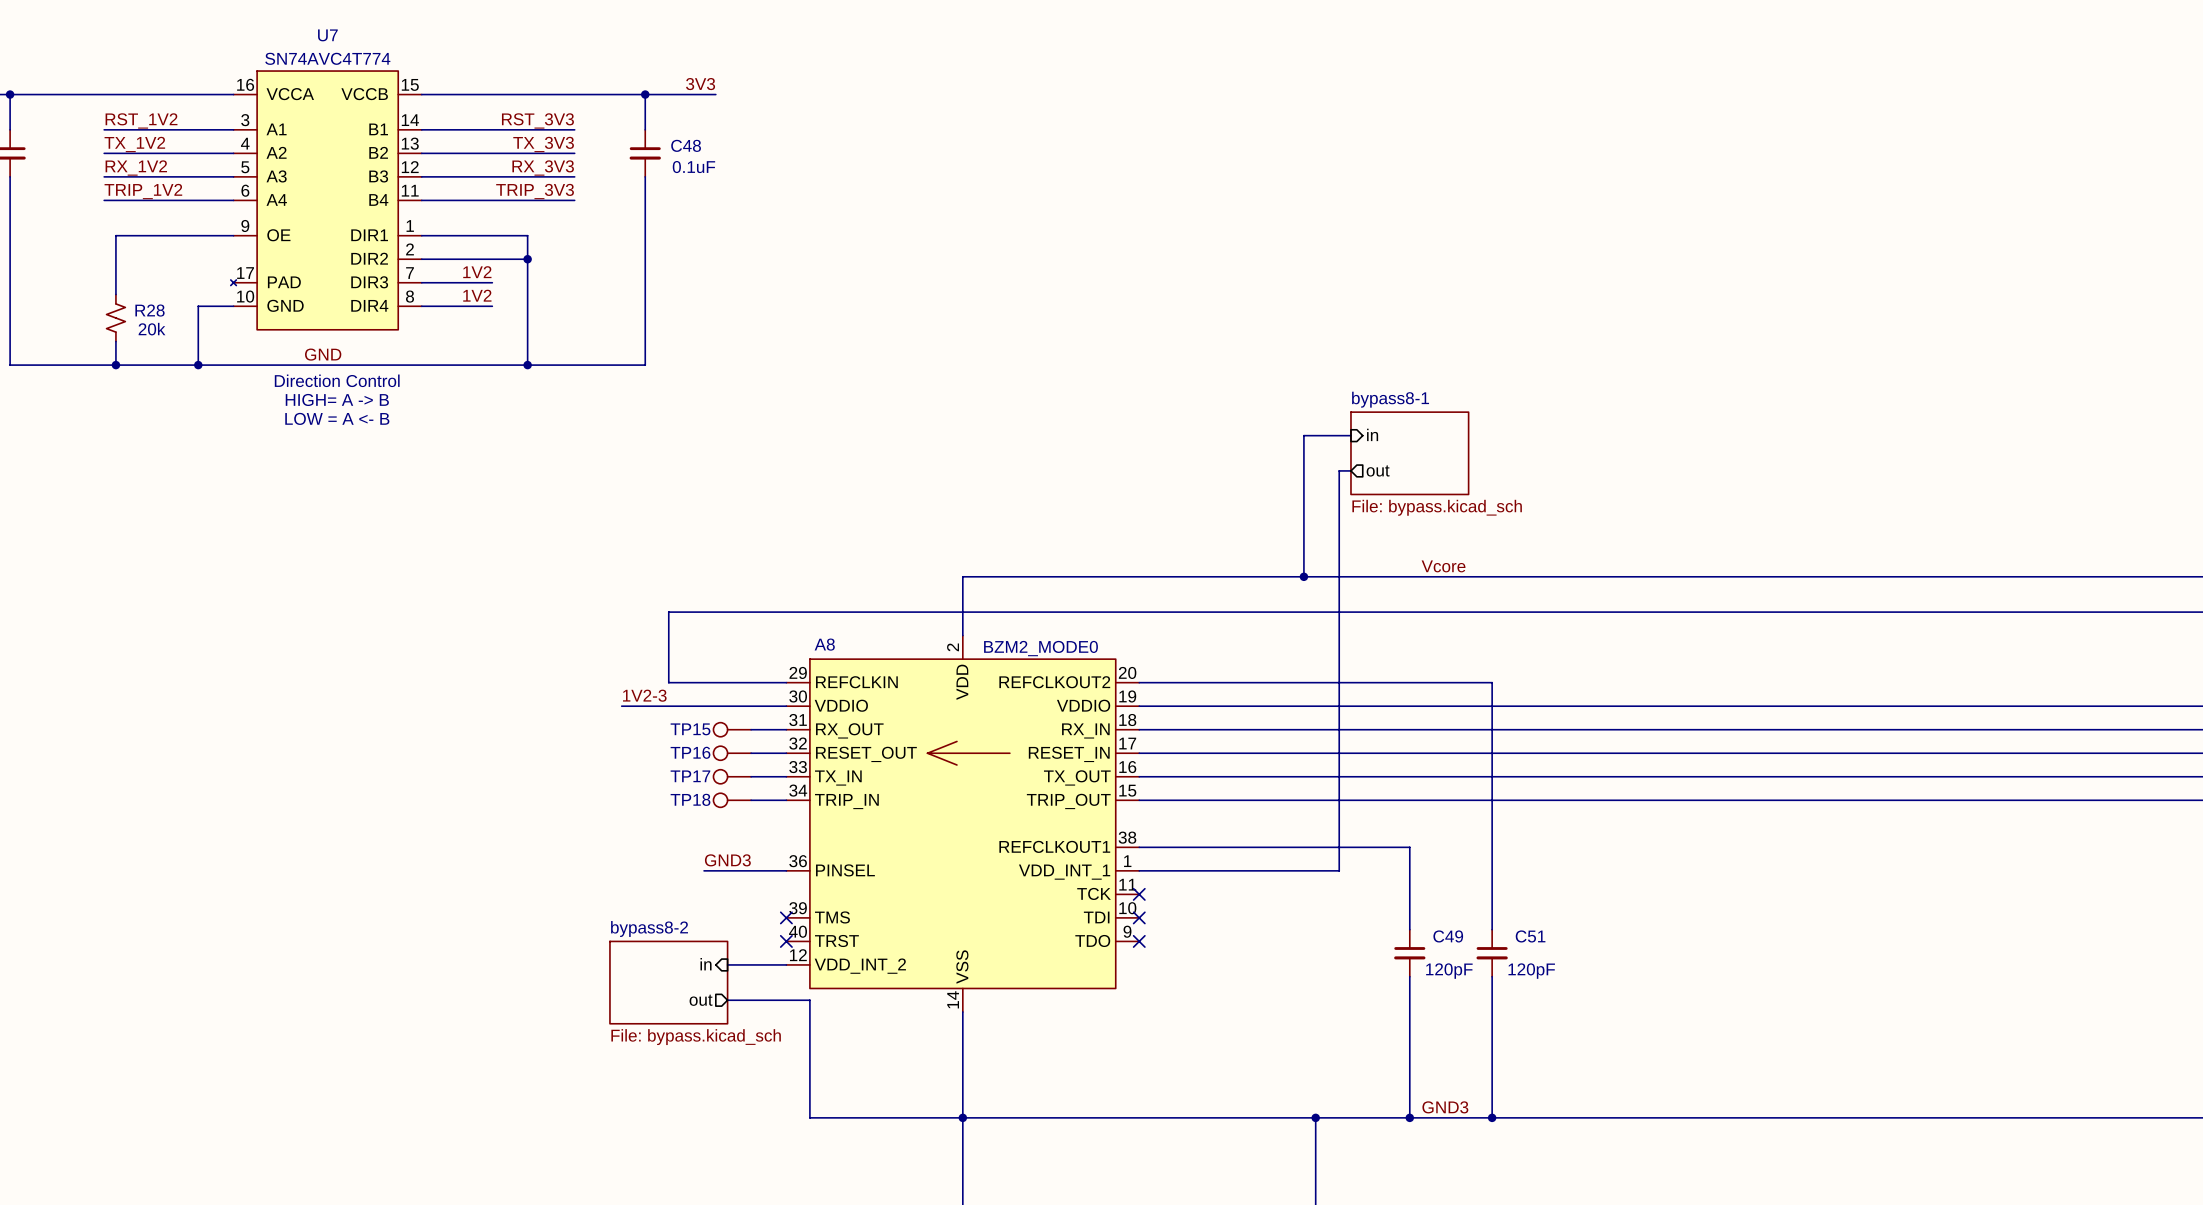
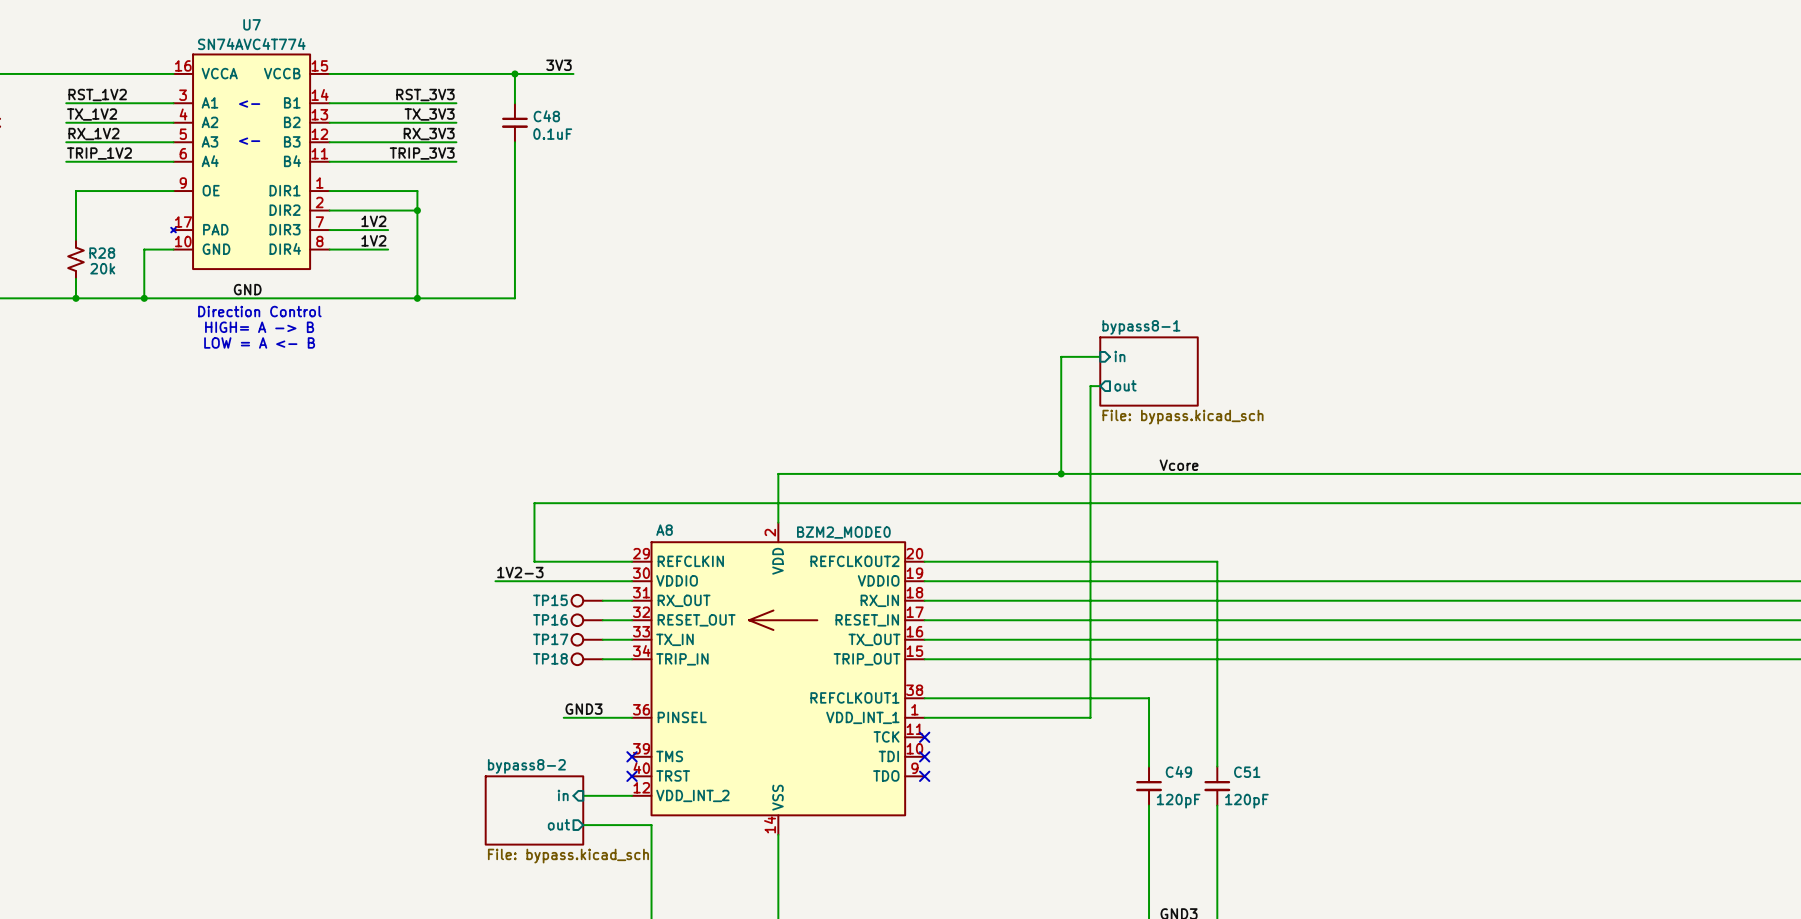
text: none -> <- (249, 104)
text: none -> <- (249, 141)

